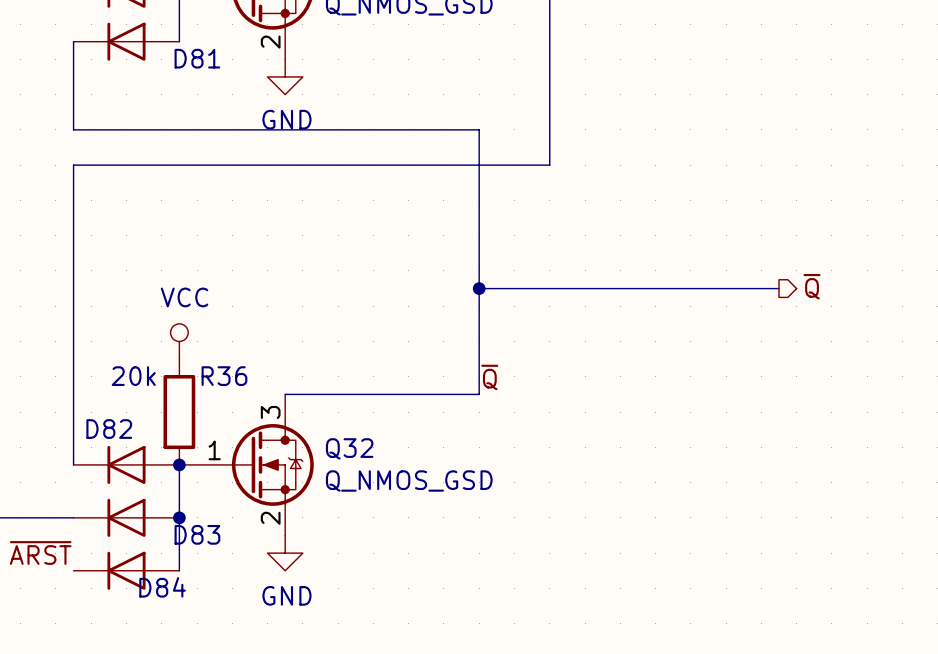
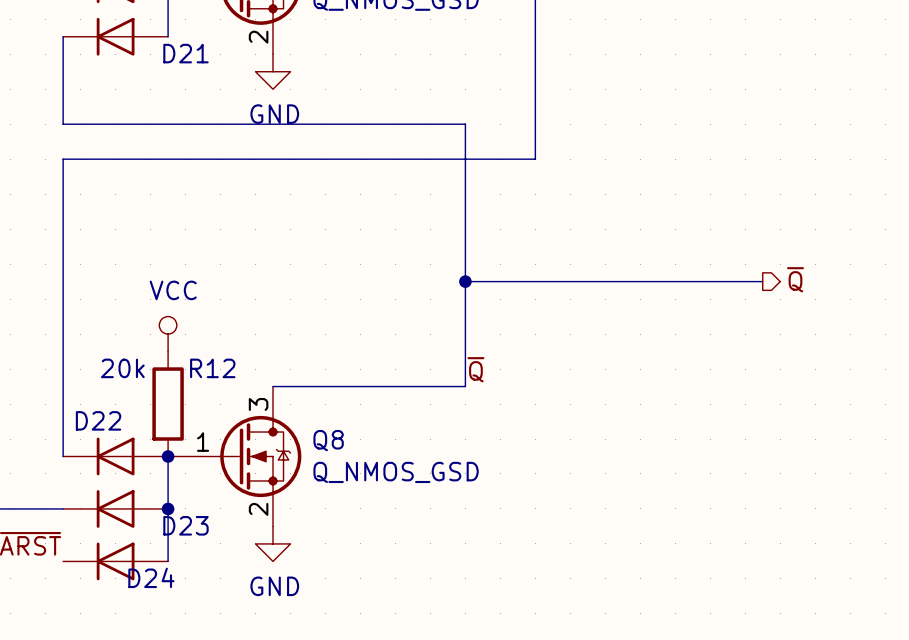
D81 name: D81 (197, 58) -> D21 (185, 53)
R36 name: R36 (224, 376) -> R12 (212, 368)
D82 name: D82 (109, 429) -> D22 (98, 420)
Q32 name: Q32 (349, 448) -> Q8 (328, 440)
D83 name: D83 (197, 534) -> D23 (185, 525)
D84 name: D84 (162, 587) -> D24 (151, 577)

